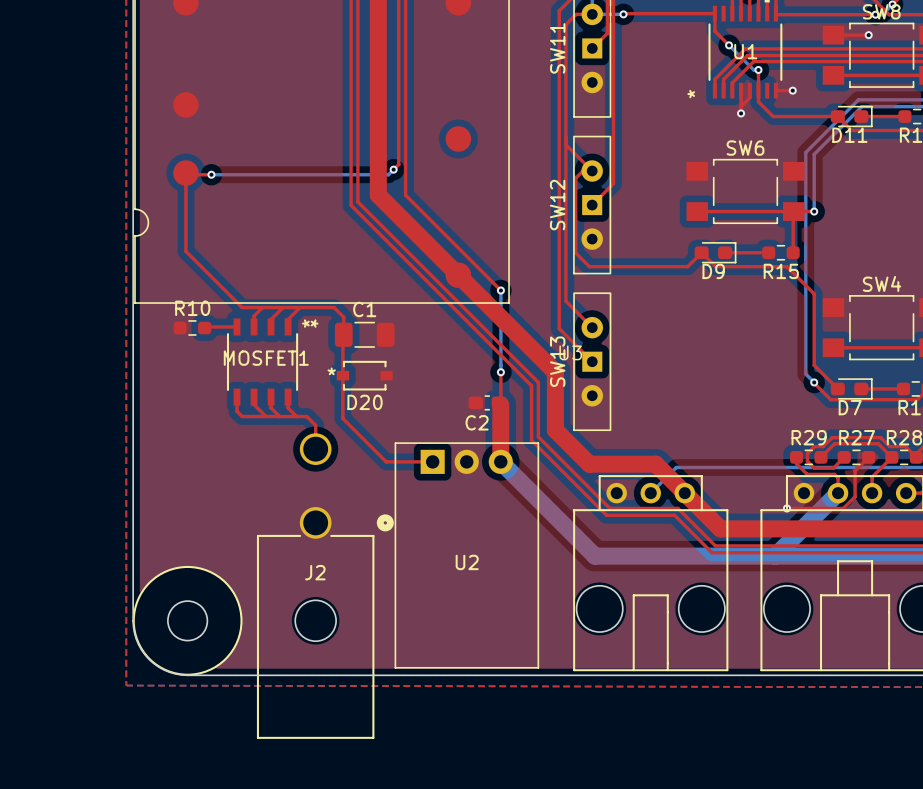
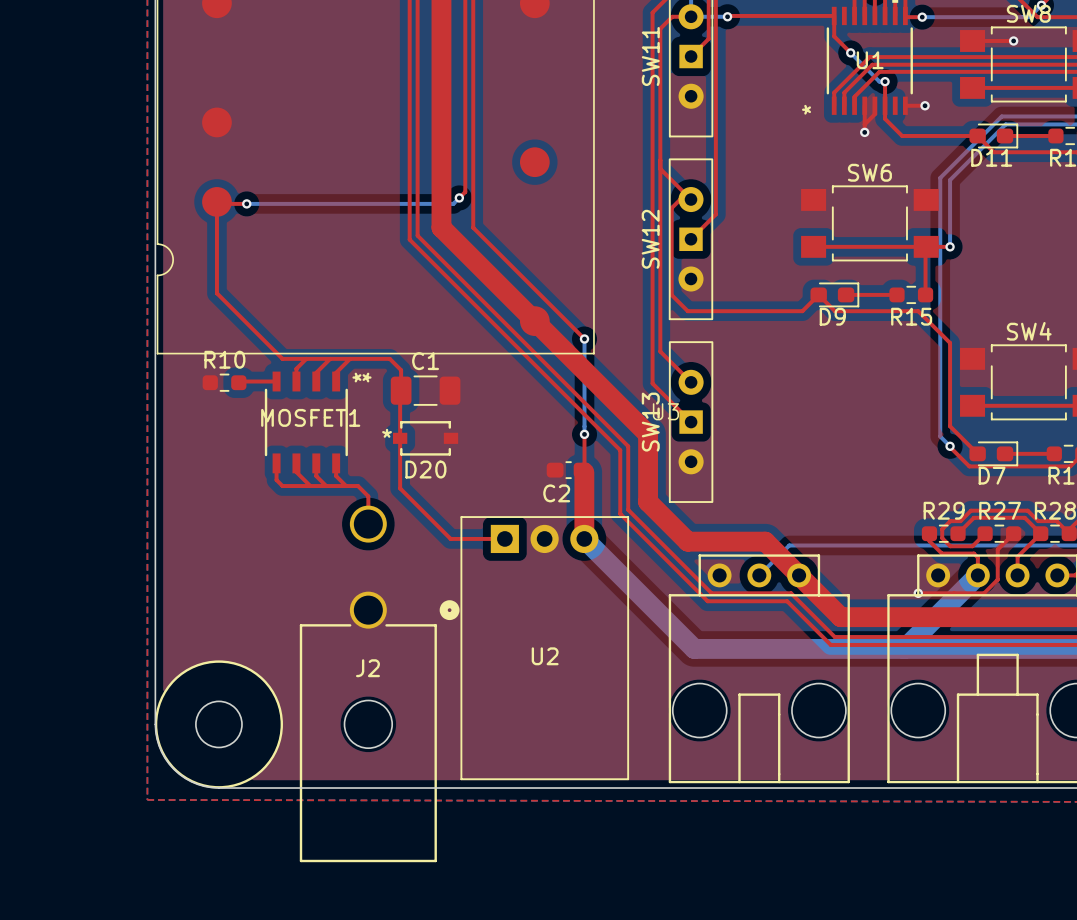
top track: (790, 14) (875, 14) -> none
bottom track: none -> (922, 17) (1021, 17)
via: none -> (922, 17)
via: (875, 14) -> none

